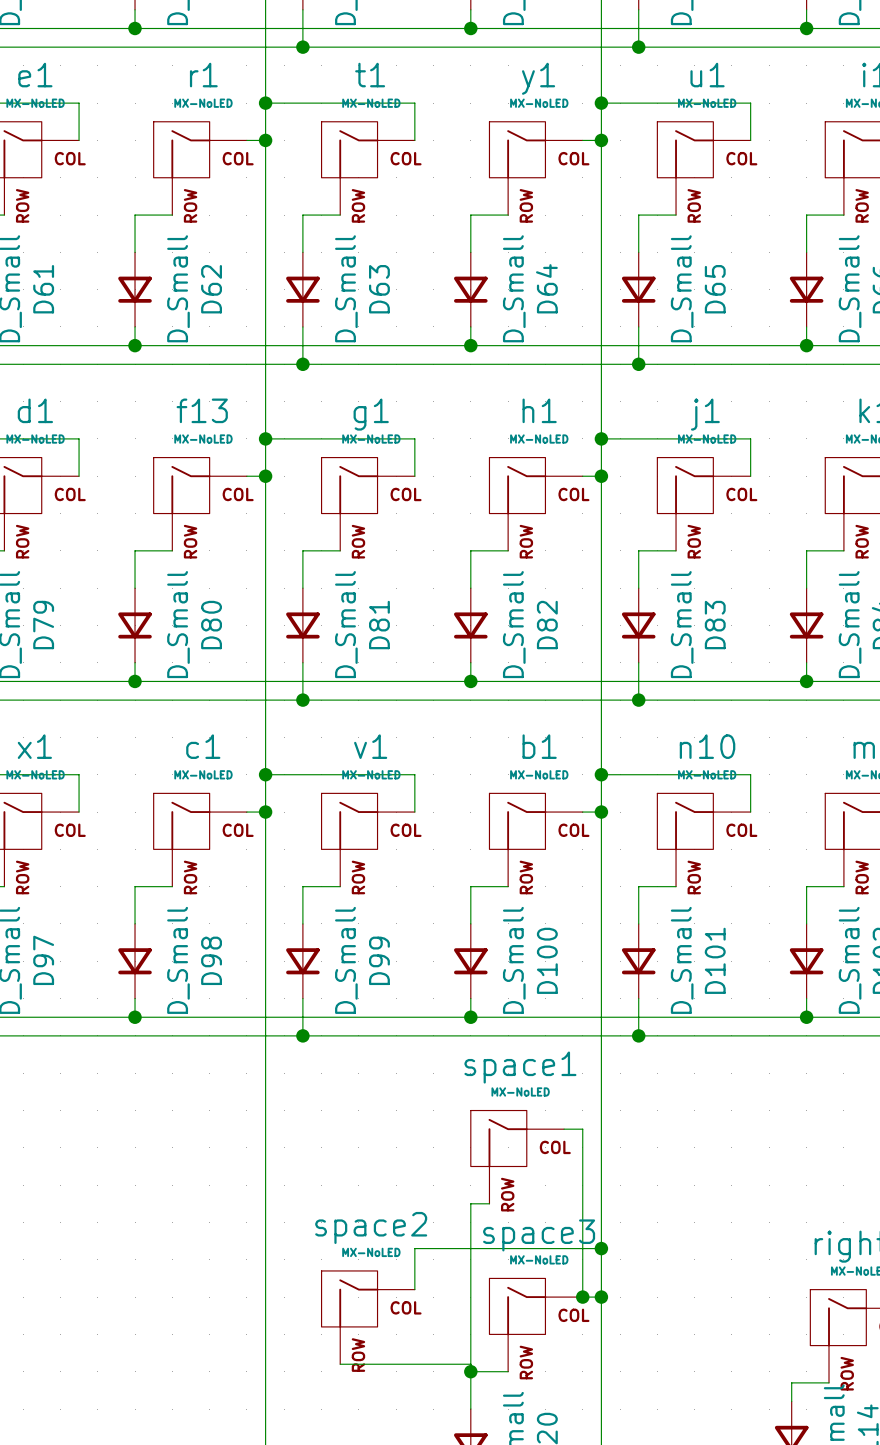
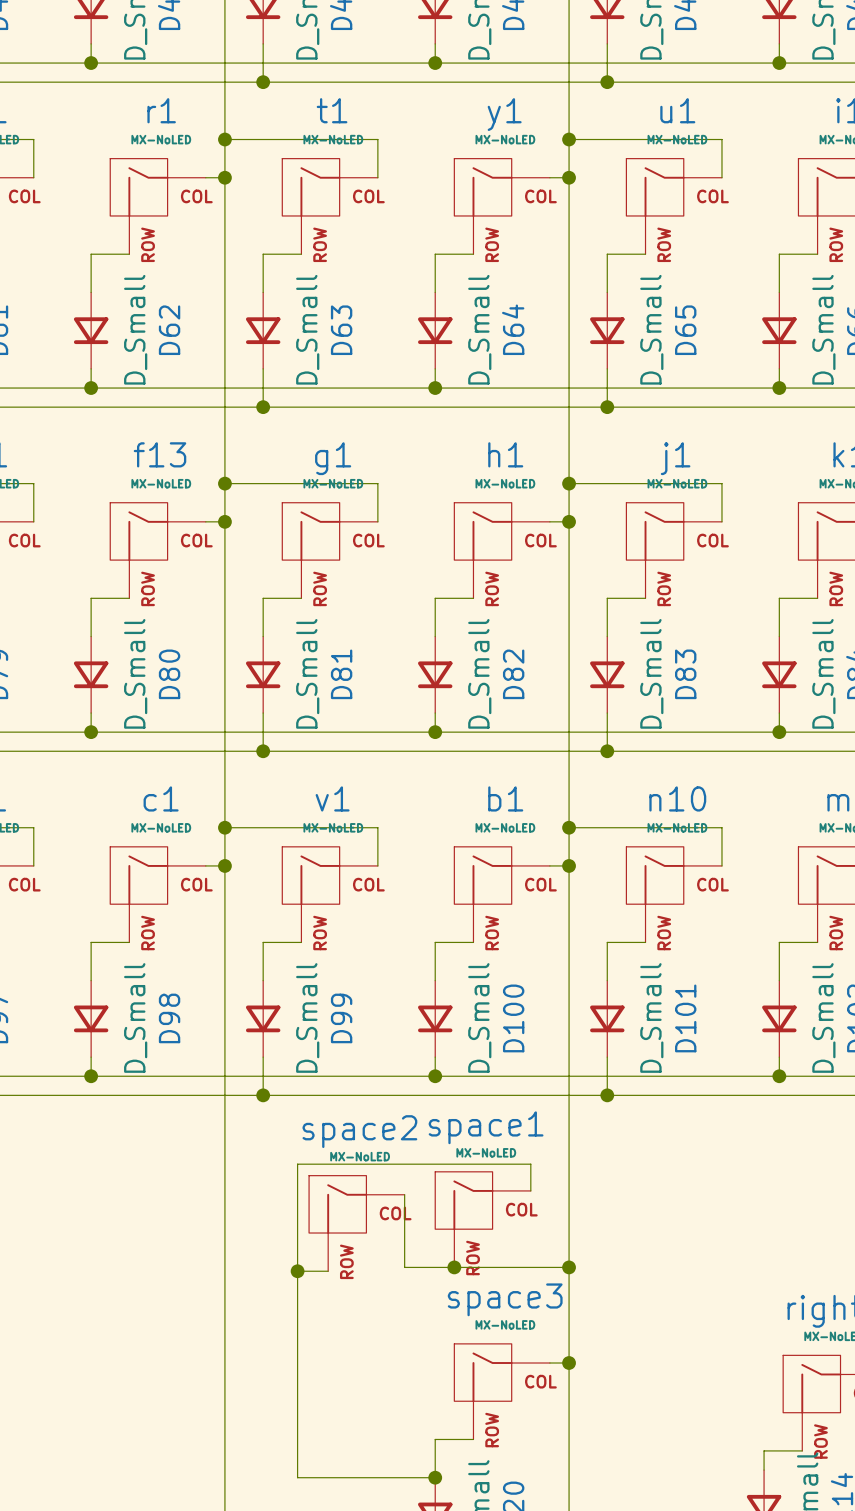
wire: (564, 1129) (582, 1129) (582, 1297) -> (530, 1190) (530, 1164) (297, 1164) (297, 1477) (435, 1477)
wire: (470, 1203) (470, 1371) -> (435, 1267) (404, 1267) (404, 1194)
wire: none -> (454, 1267) (569, 1267)
junction: none -> (454, 1267)
wire: none -> (297, 1271) (328, 1271)
junction: none -> (297, 1271)
wire: (601, 1248) (414, 1248) (414, 1289) -> none
junction position: (601, 1248) -> (569, 1267)
junction: (582, 1297) -> none
space2 position: (368, 1317) -> (356, 1223)
wire: (340, 1364) (470, 1364) -> none
junction position: (470, 1371) -> (435, 1477)

